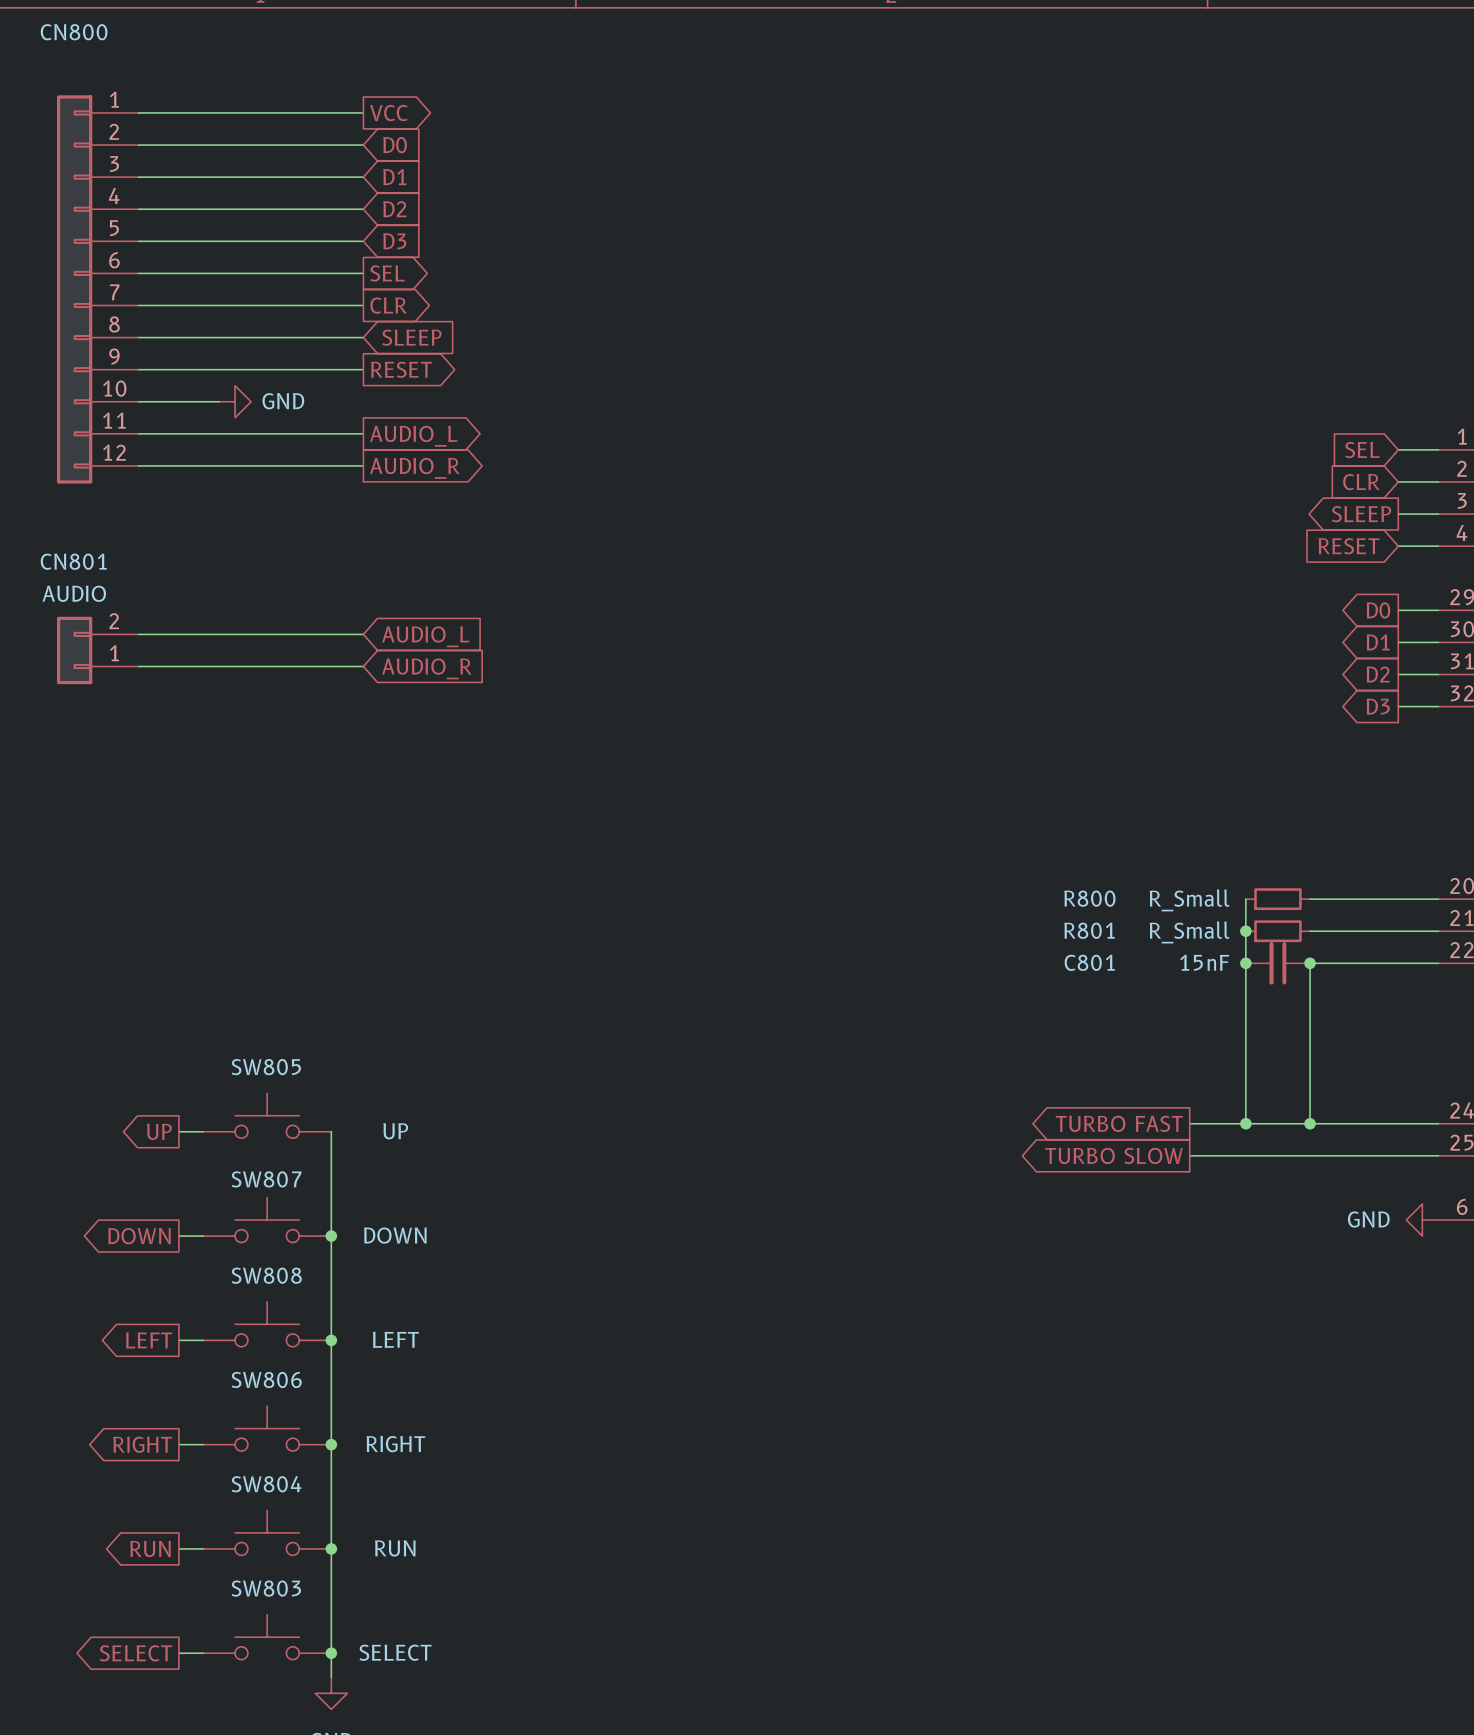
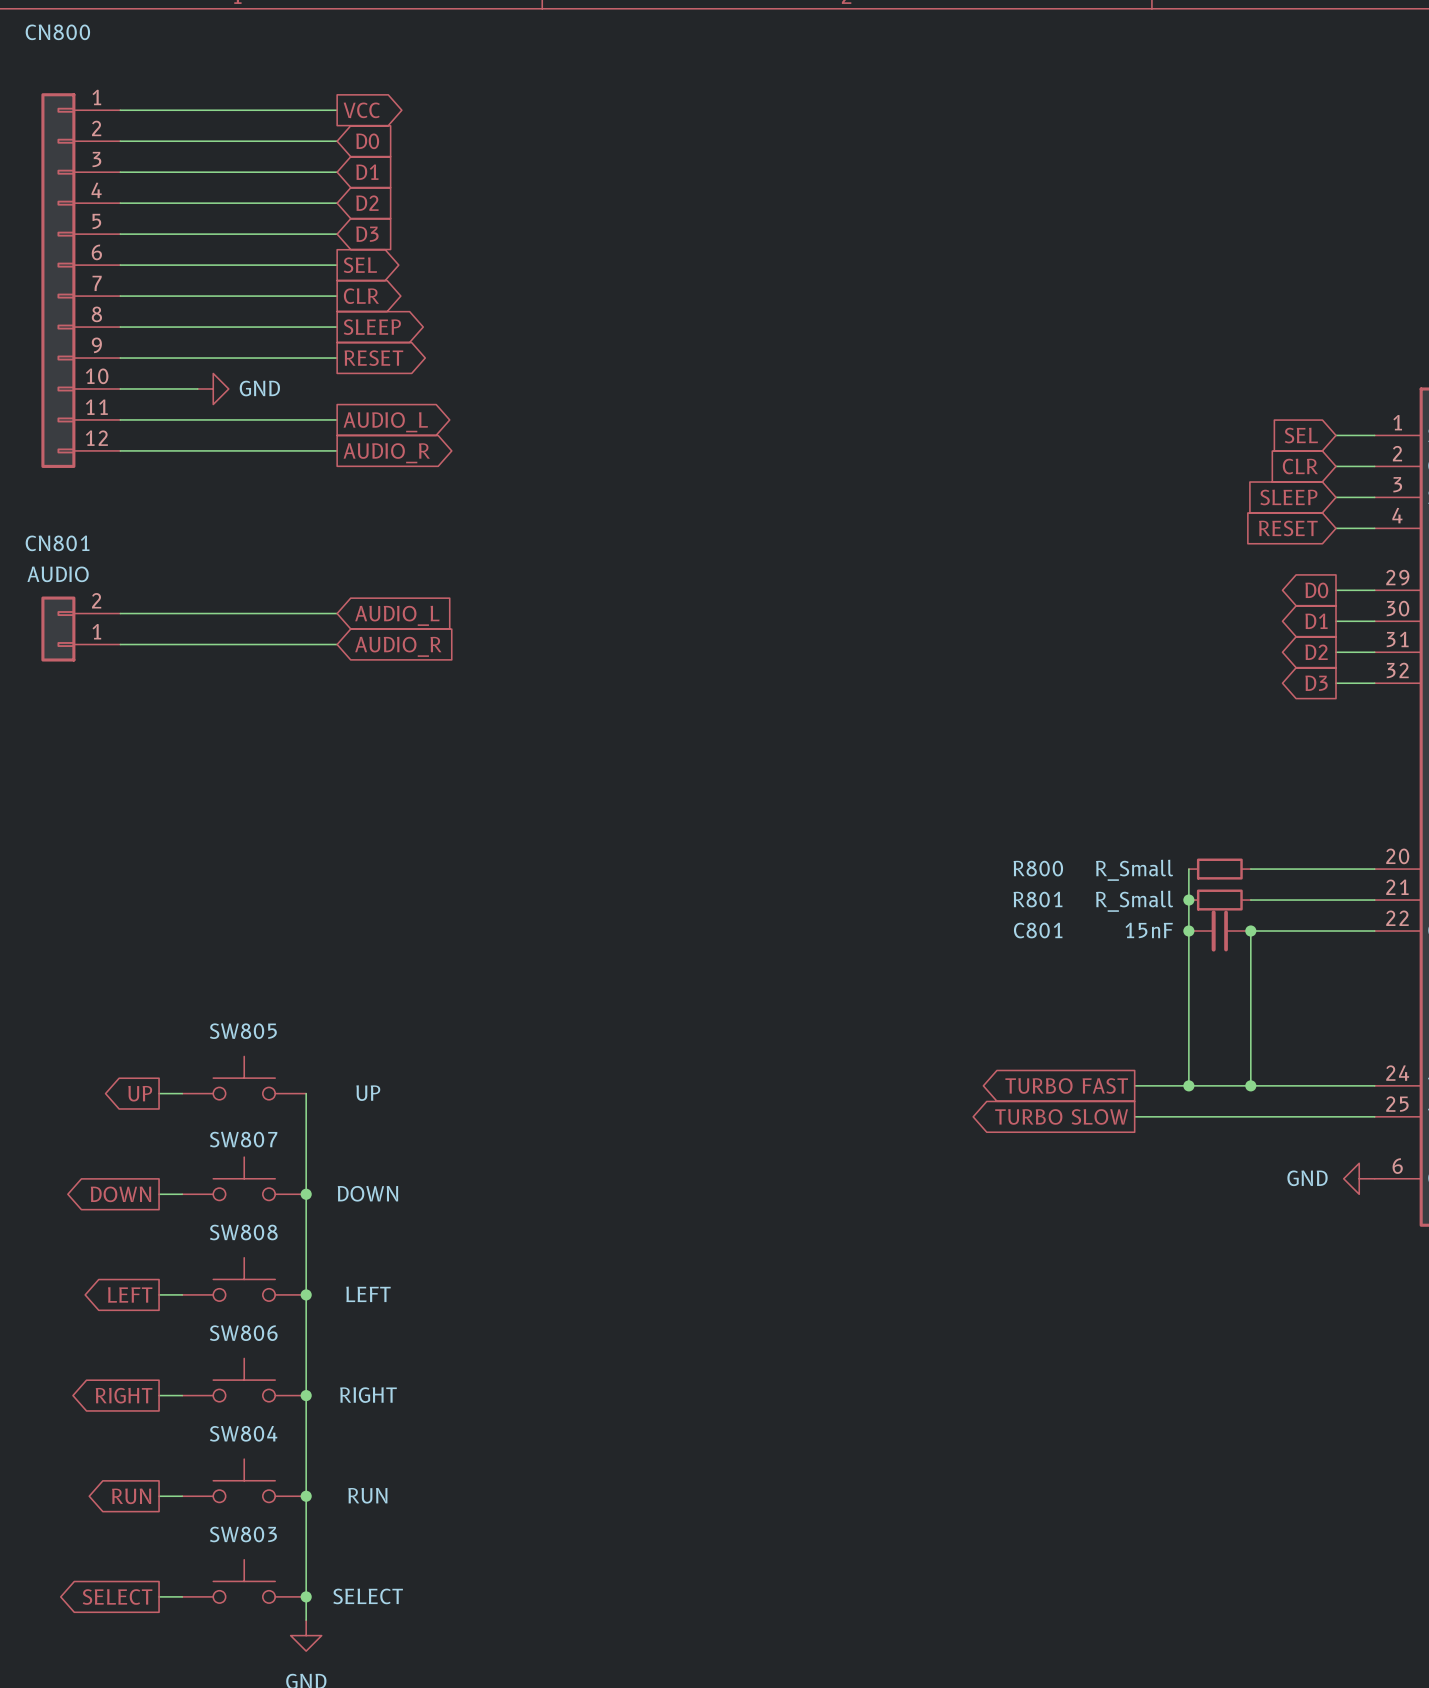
global label shape: input (411, 337) -> output (372, 327)
global label shape: output (1361, 514) -> input (1288, 497)

